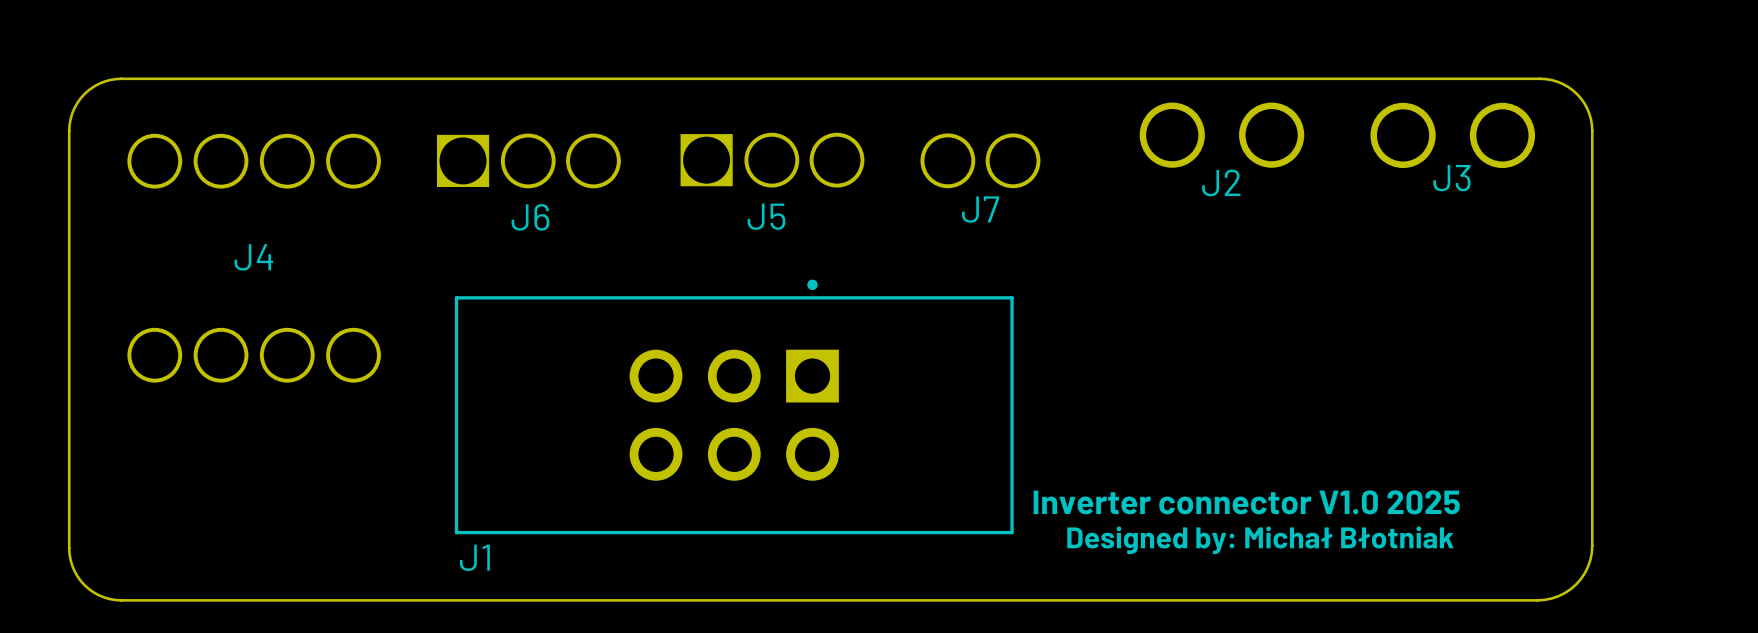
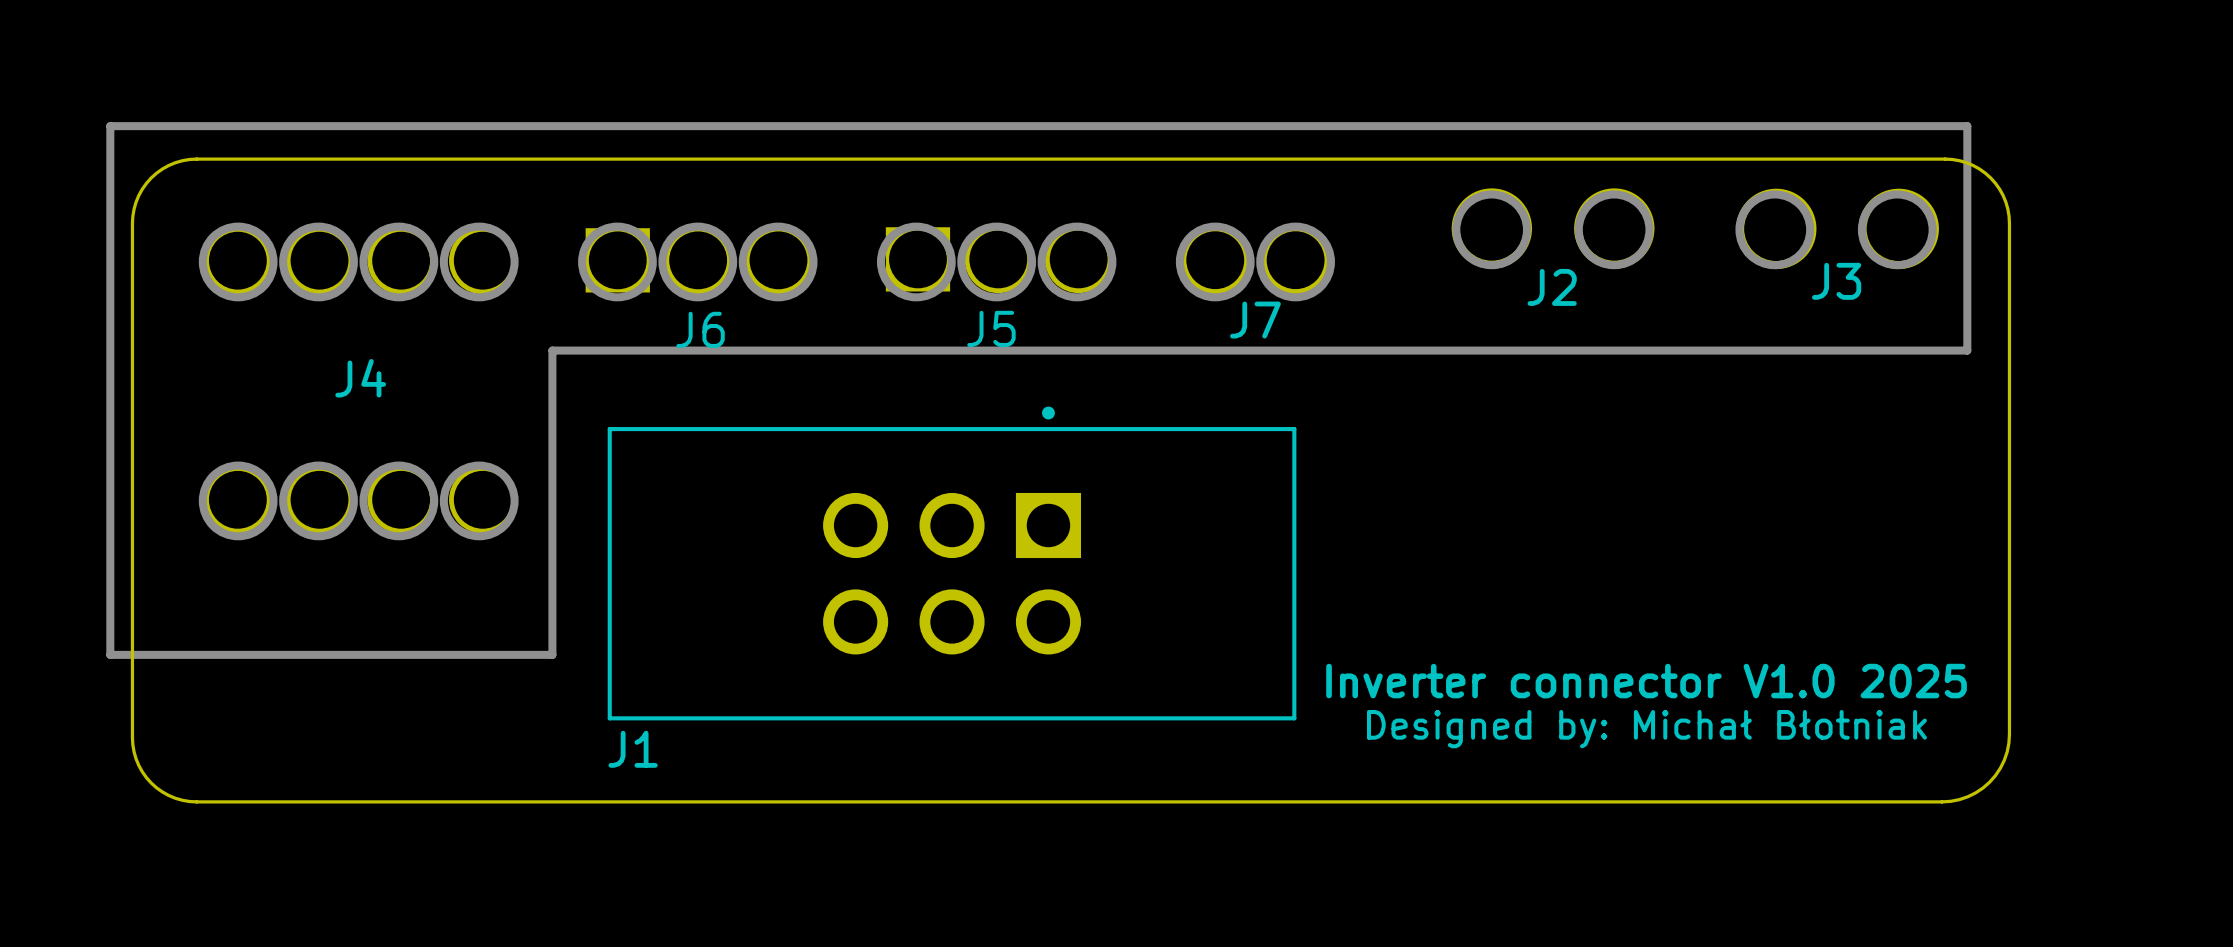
line: none -> (110, 126) (1967, 126) (1967, 350) (552, 350) (552, 654) (110, 654) (110, 126)
drawing: none -> [1452, 190, 1532, 270]
drawing: none -> [1574, 190, 1654, 270]
drawing: none -> [1735, 190, 1815, 270]
drawing: none -> [1857, 190, 1937, 270]
drawing: none -> [198, 222, 519, 302]
drawing: none -> [578, 222, 818, 302]
drawing: none -> [876, 222, 1117, 302]
drawing: none -> [1175, 222, 1335, 302]
drawing: none -> [198, 461, 519, 541]

